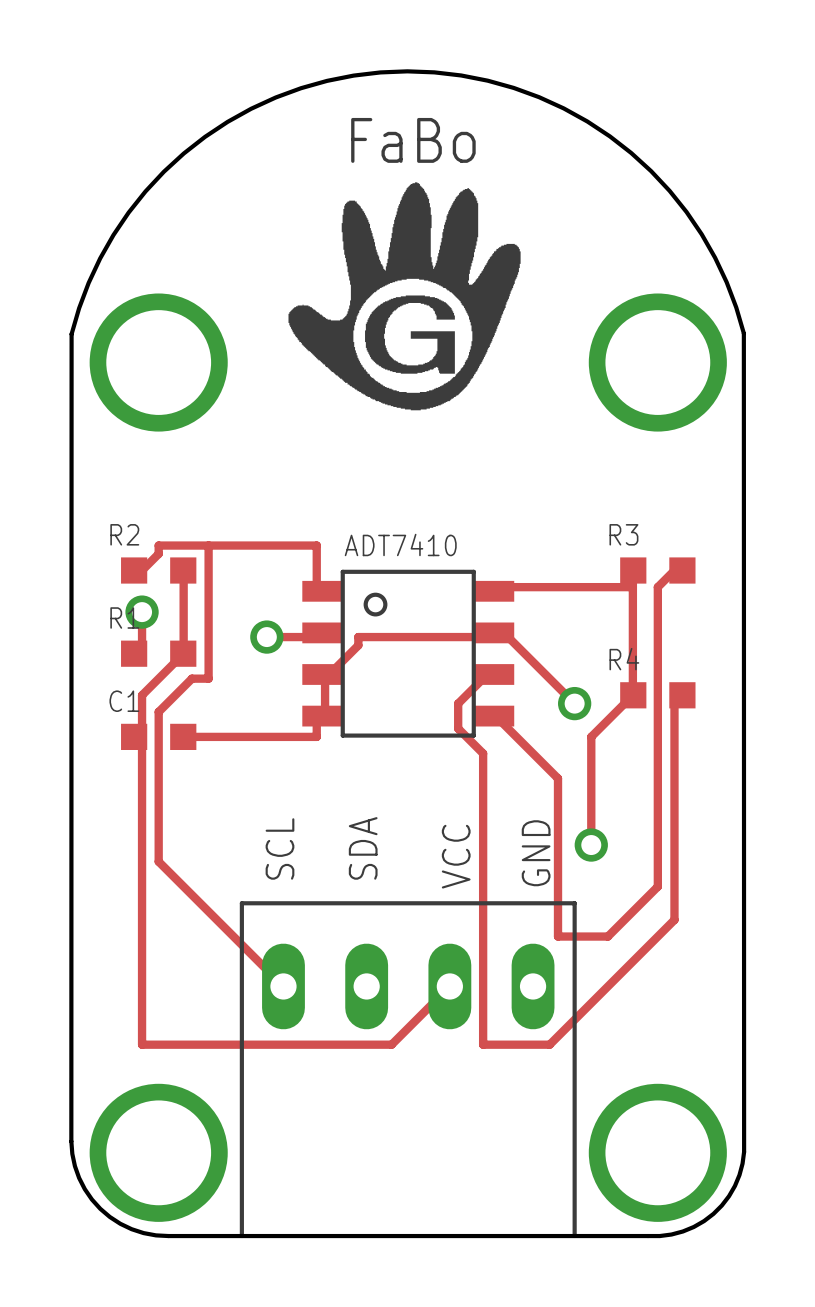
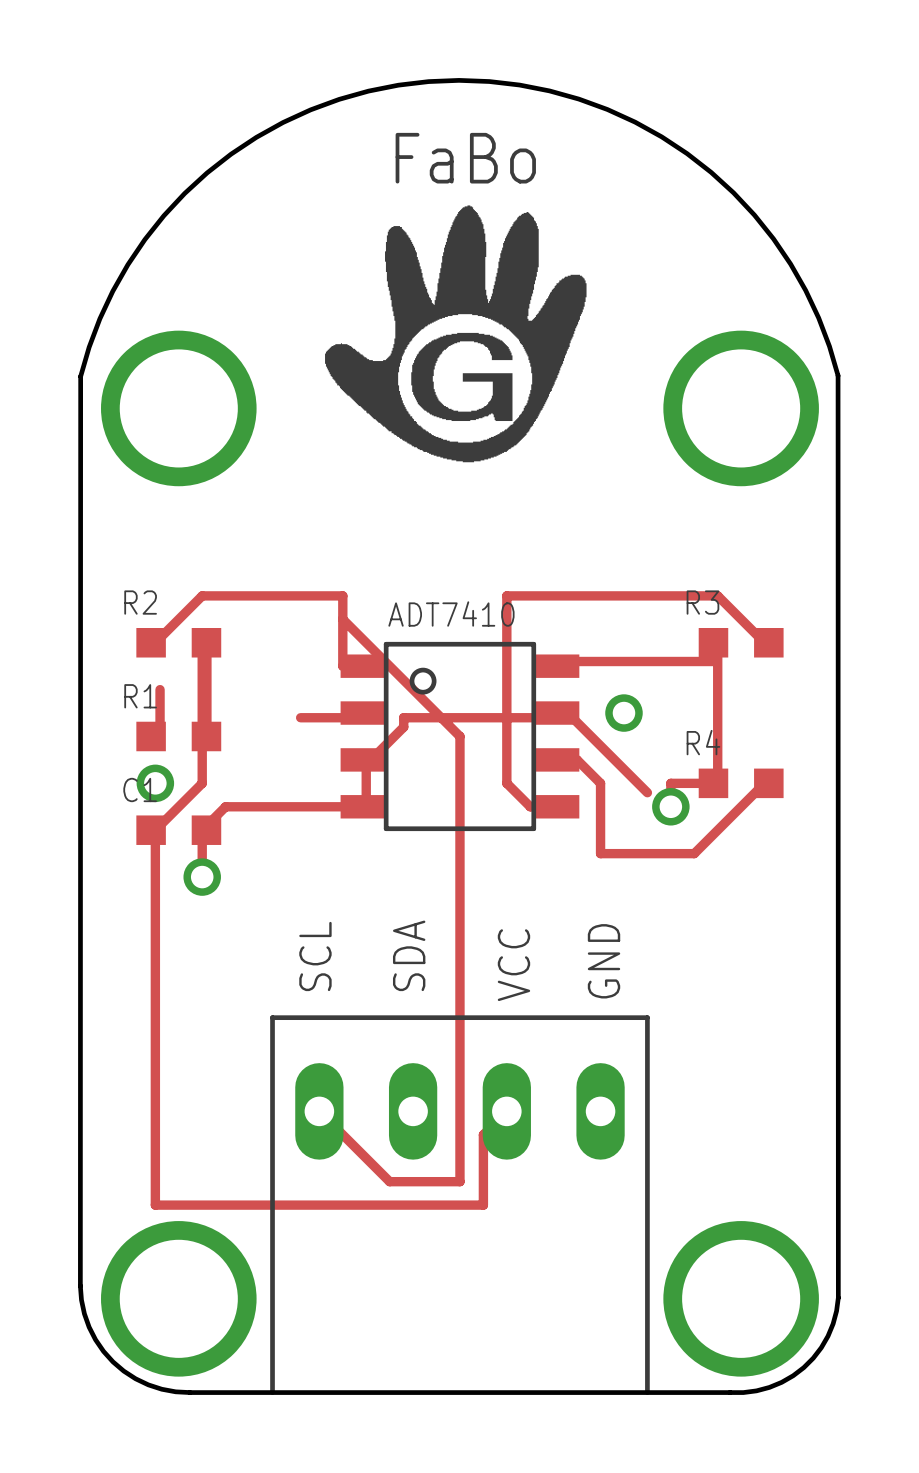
track: (208, 545) (208, 678) (191, 678) (158, 711) (158, 861) (283, 986) -> (342, 619) (459, 736) (459, 1181) (389, 1181) (319, 1111)
track: (137, 570) (142, 570) (158, 553) (158, 545) (316, 545) (316, 587) (323, 591) -> (155, 642) (202, 595) (342, 595) (342, 666) (364, 666)
track: (632, 570) (632, 695) (591, 736) (591, 845) -> (713, 642) (717, 642) (717, 783) (713, 783)
track: (678, 570) (674, 570) (657, 587) (657, 886) (607, 936) (558, 936) (558, 778) (493, 716) -> (764, 642) (717, 595) (506, 595) (506, 783) (530, 806) (555, 806)
via: (142, 612) -> none
via: none -> (623, 713)
via: (266, 637) -> none
track: (179, 653) (175, 653) (175, 662) (142, 695) (142, 1044) (391, 1044) (429, 1007) -> (206, 642) (202, 642) (202, 783) (155, 830) (155, 1205) (483, 1205) (483, 1134)
track: (493, 674) (491, 670) (458, 703) (458, 728) (483, 753) (483, 1044) (549, 1044) (674, 919) (674, 695) (678, 695) -> (555, 759) (577, 759) (600, 783) (600, 853) (694, 853) (764, 783)
via: none -> (155, 783)
track: none -> (713, 783) (670, 783) (670, 806)
via position: (574, 703) -> (670, 806)
track: (325, 711) (323, 716) (316, 720) (316, 736) (183, 736) -> (366, 802) (366, 806) (225, 806) (202, 830) (202, 877)
via: none -> (202, 877)
via: (591, 845) -> none

